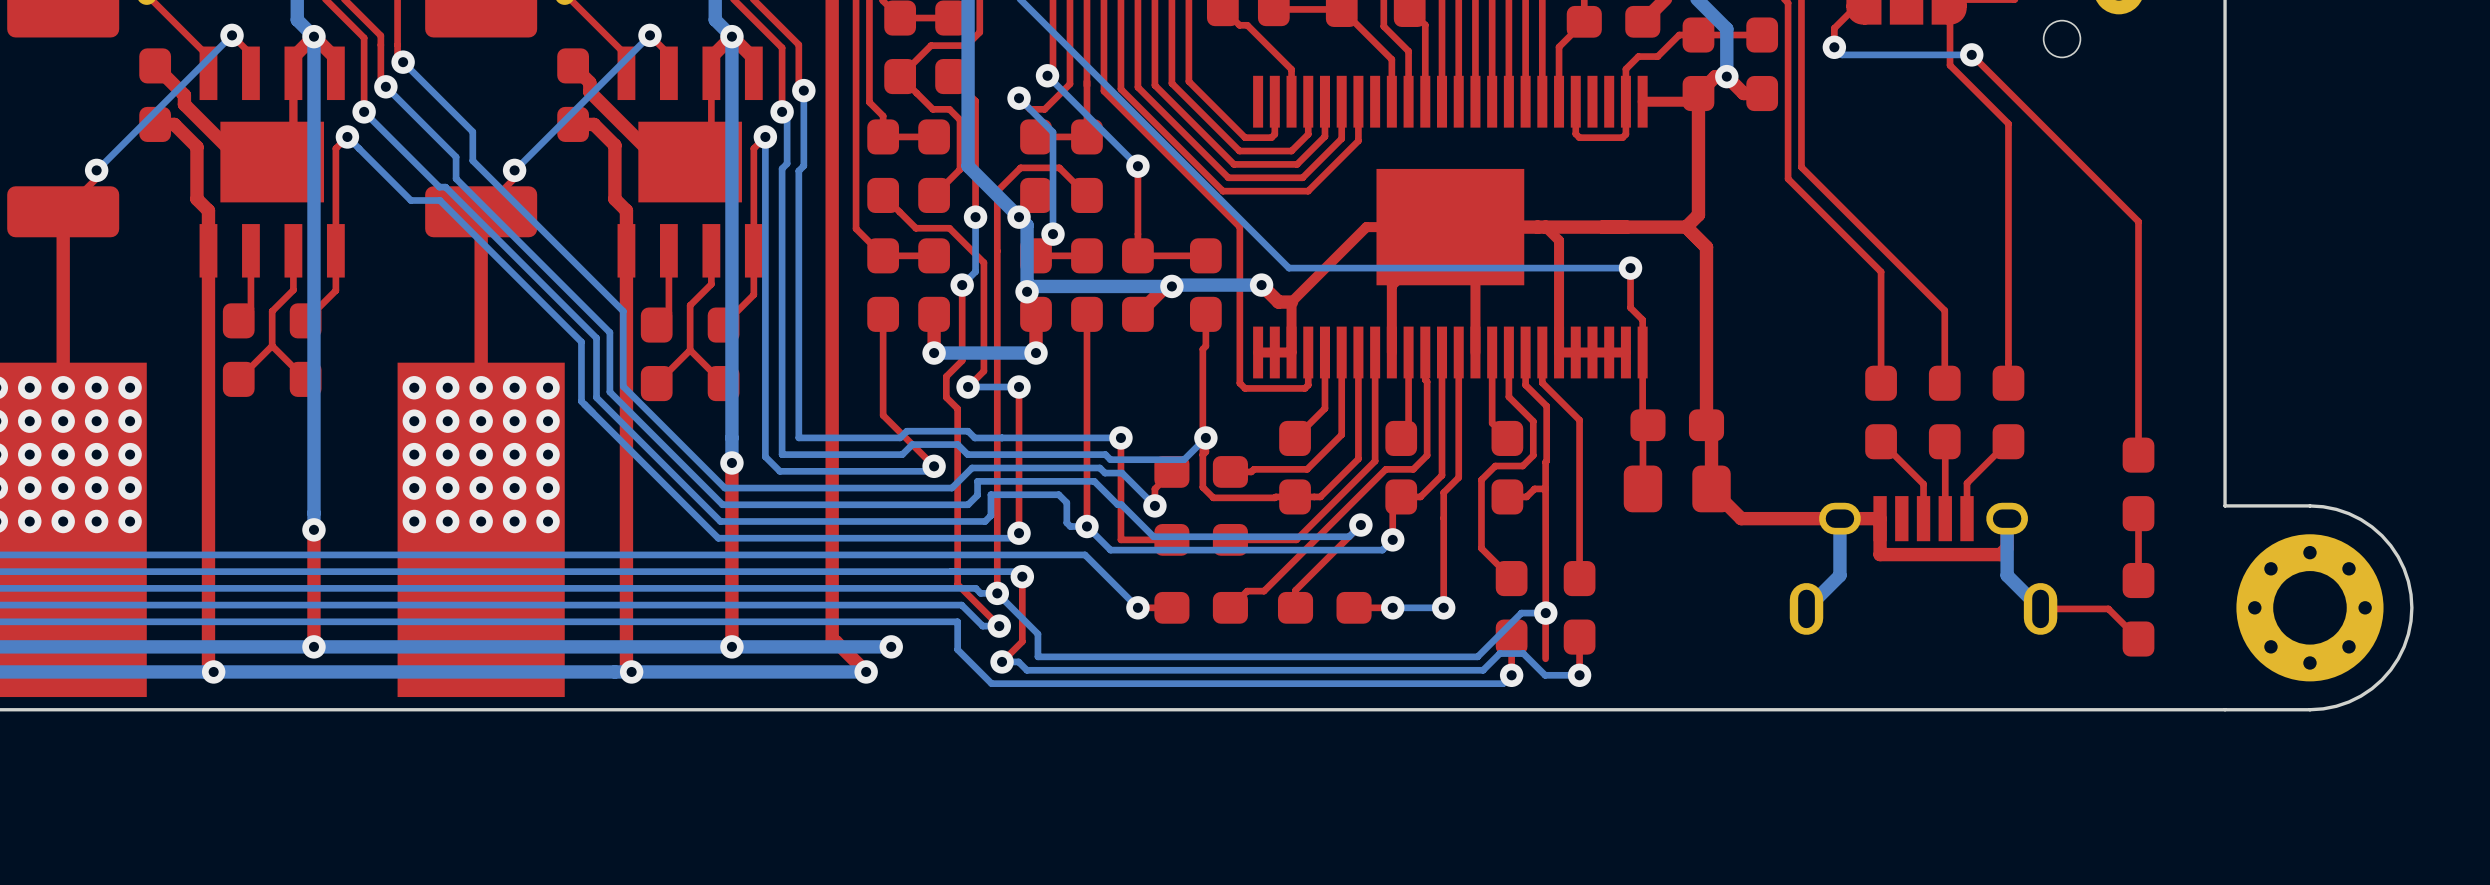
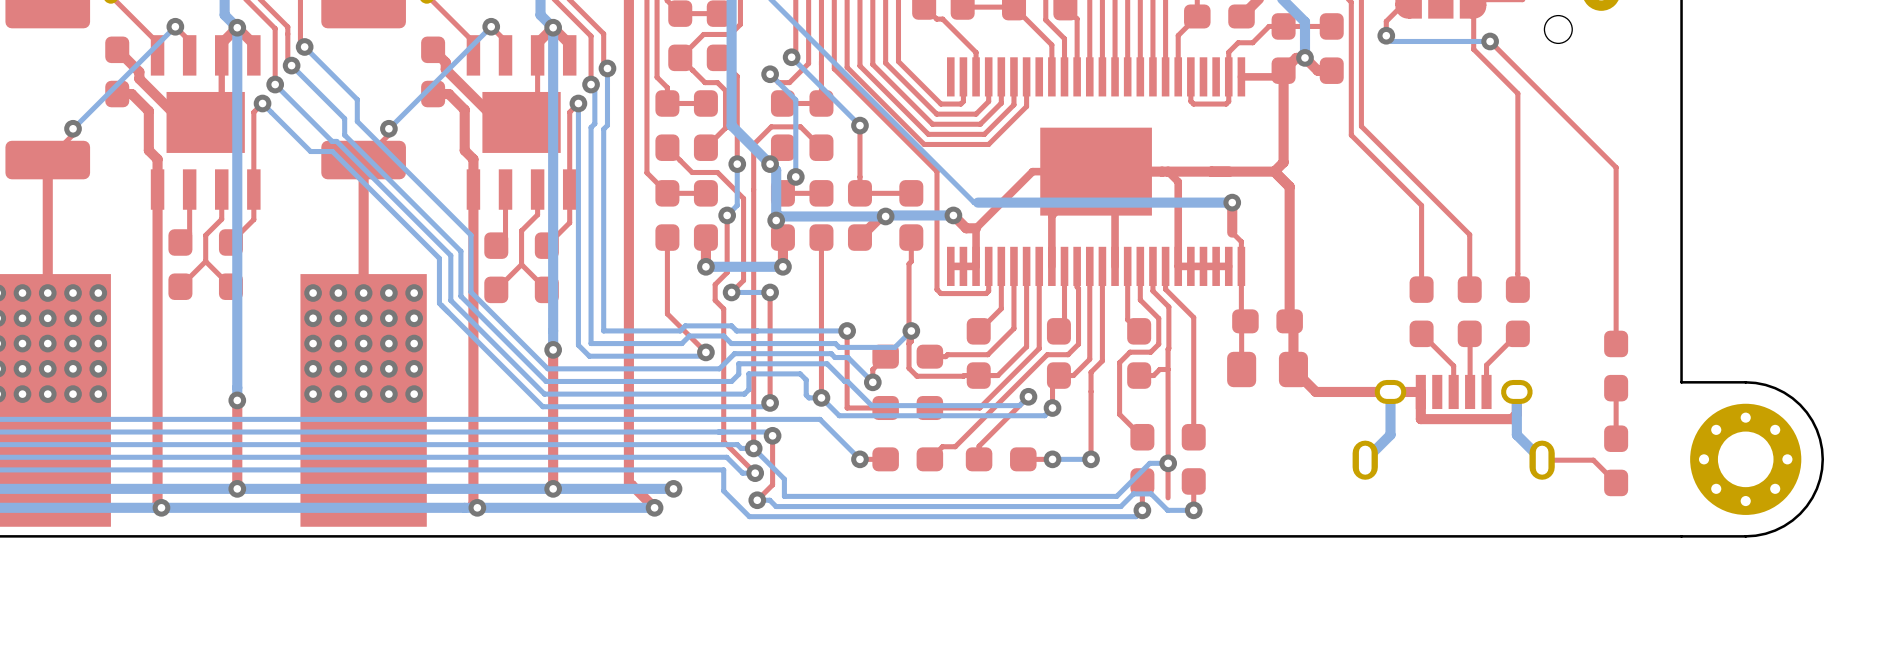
top track width: thin (1630, 268) (1630, 307) -> thick (1232, 202) (1232, 232)
bottom track width: thin (1630, 268) (1293, 268) -> thick (1232, 202) (977, 202)

